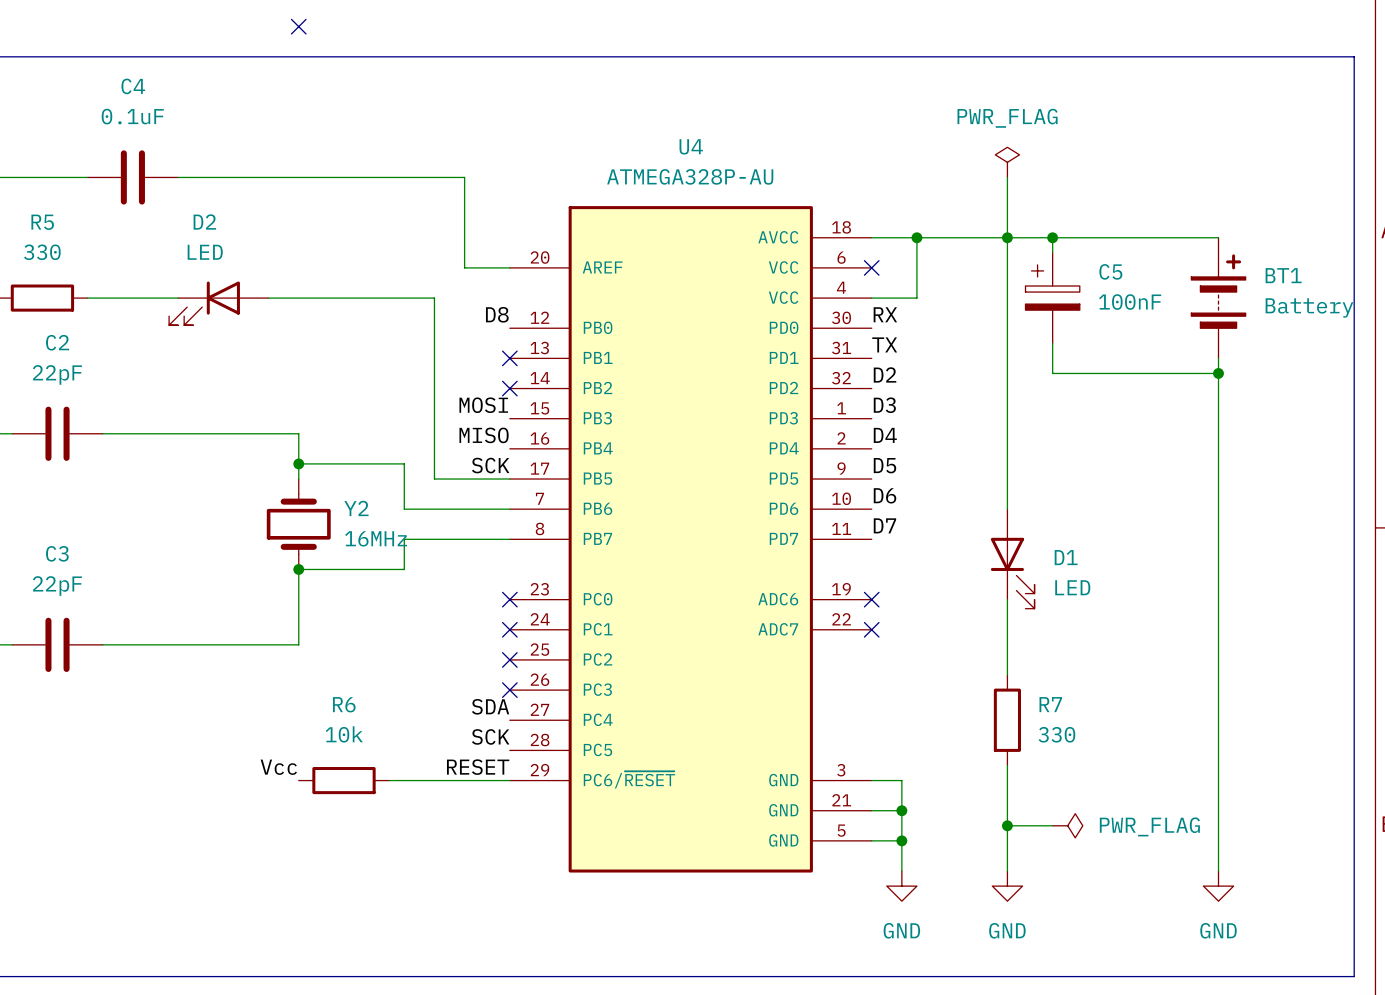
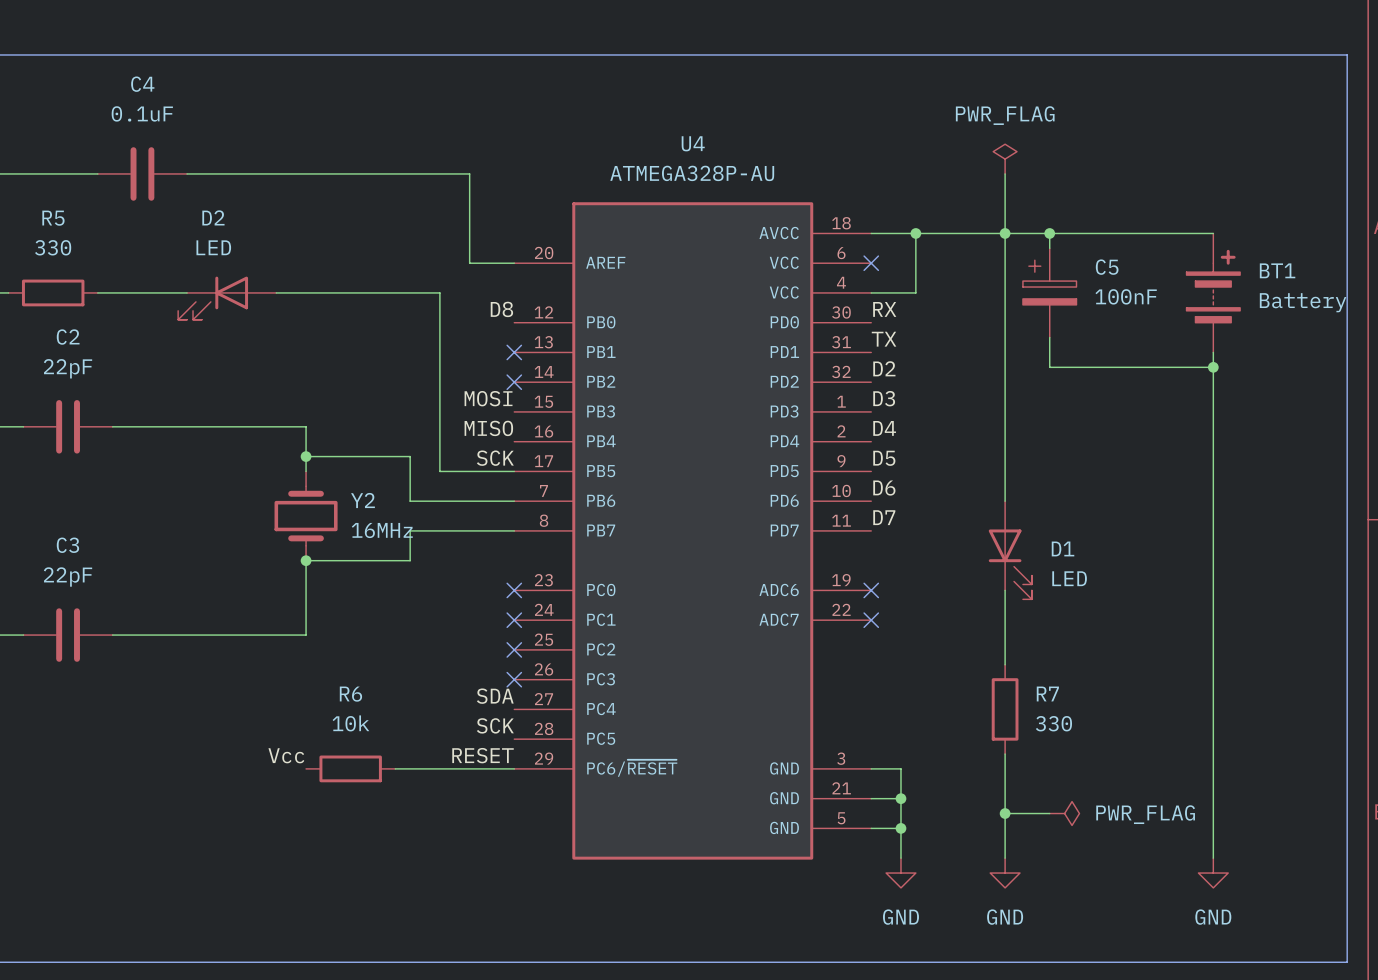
no-connect mark: (298, 26) -> none

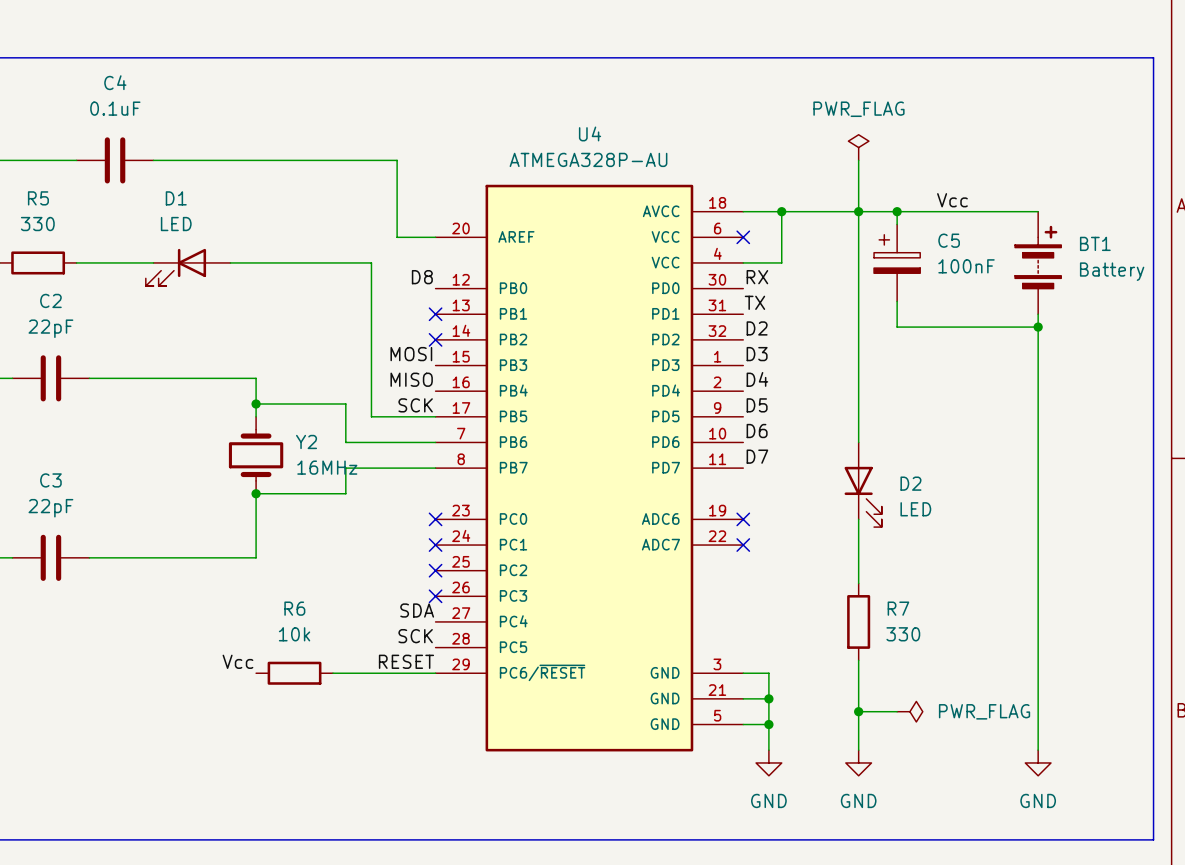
D2 name: D2 (213, 217) -> D1 (176, 198)
label: none -> Vcc (952, 200)
D1 name: D1 (1063, 548) -> D2 (910, 483)

